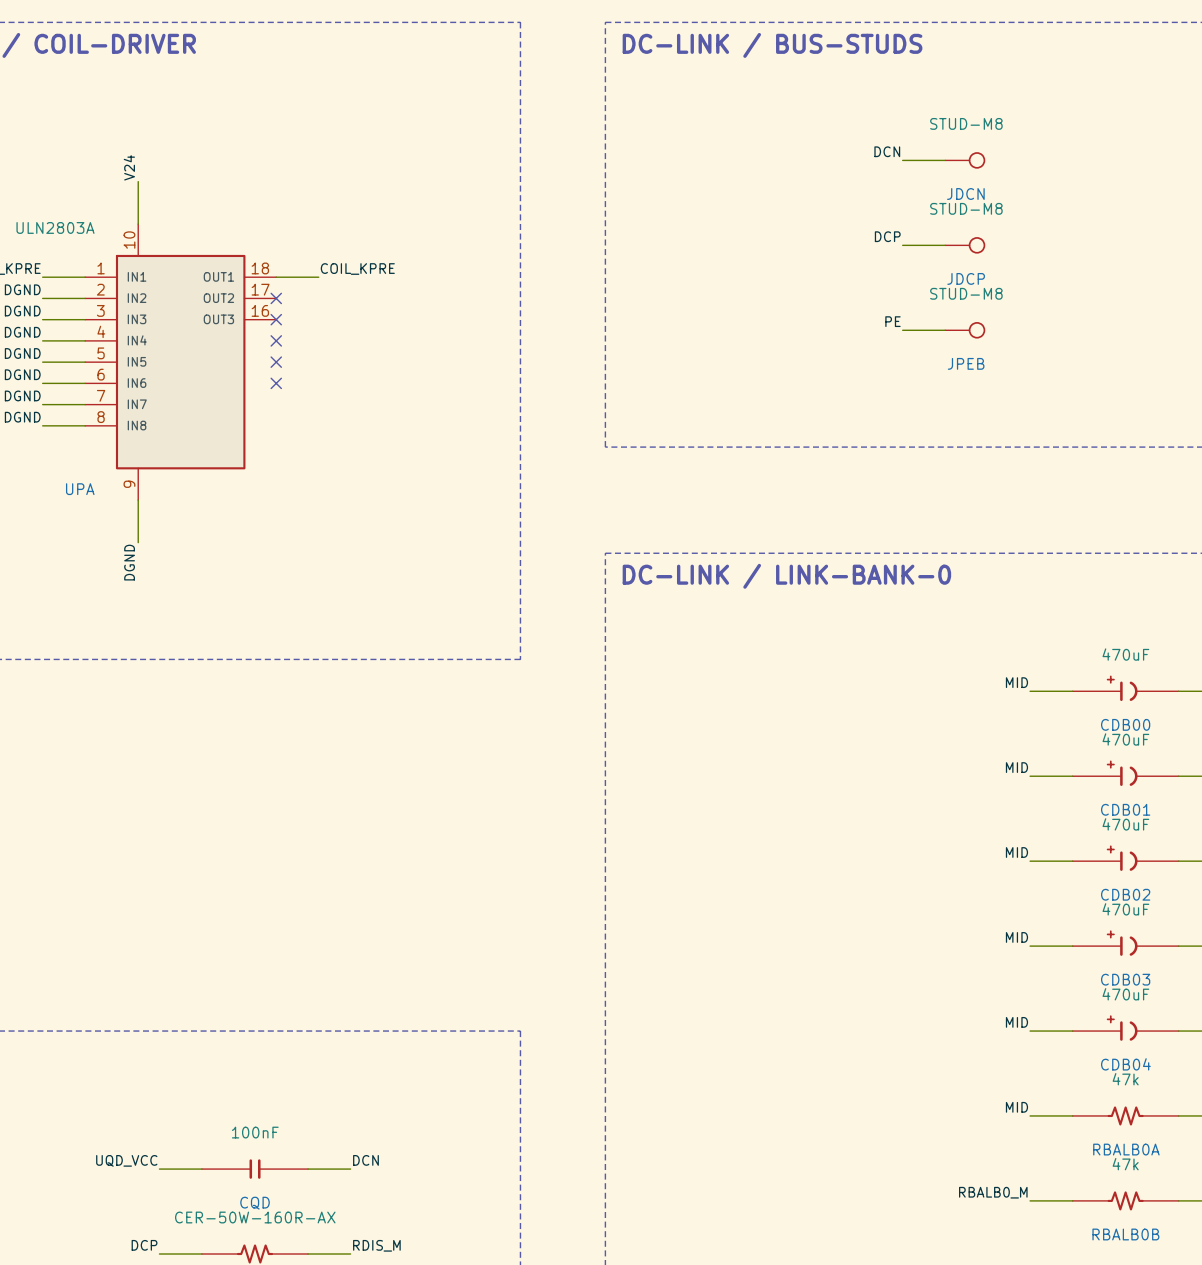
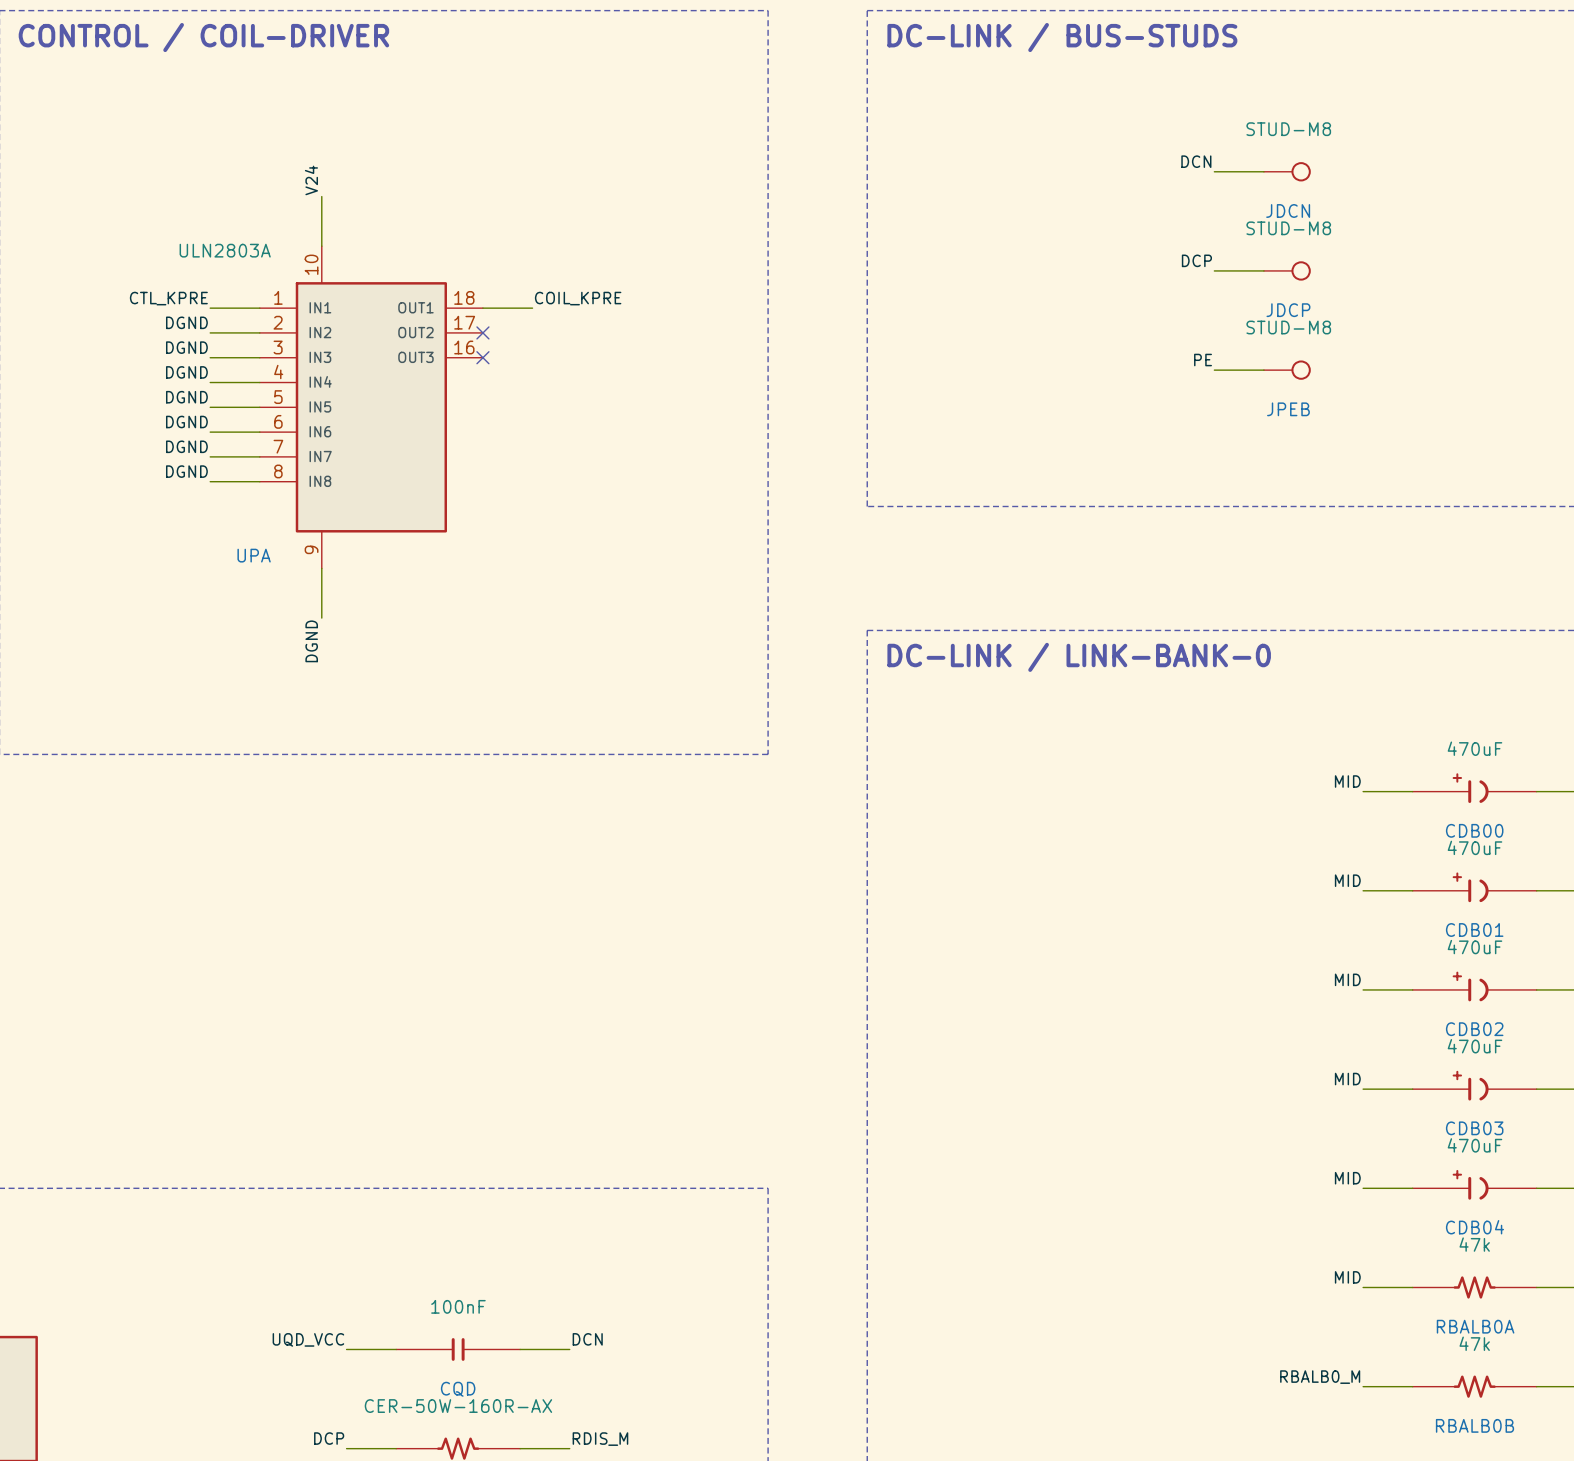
no-connect mark: (276, 340) -> none
no-connect mark: (276, 362) -> none
no-connect mark: (276, 383) -> none

